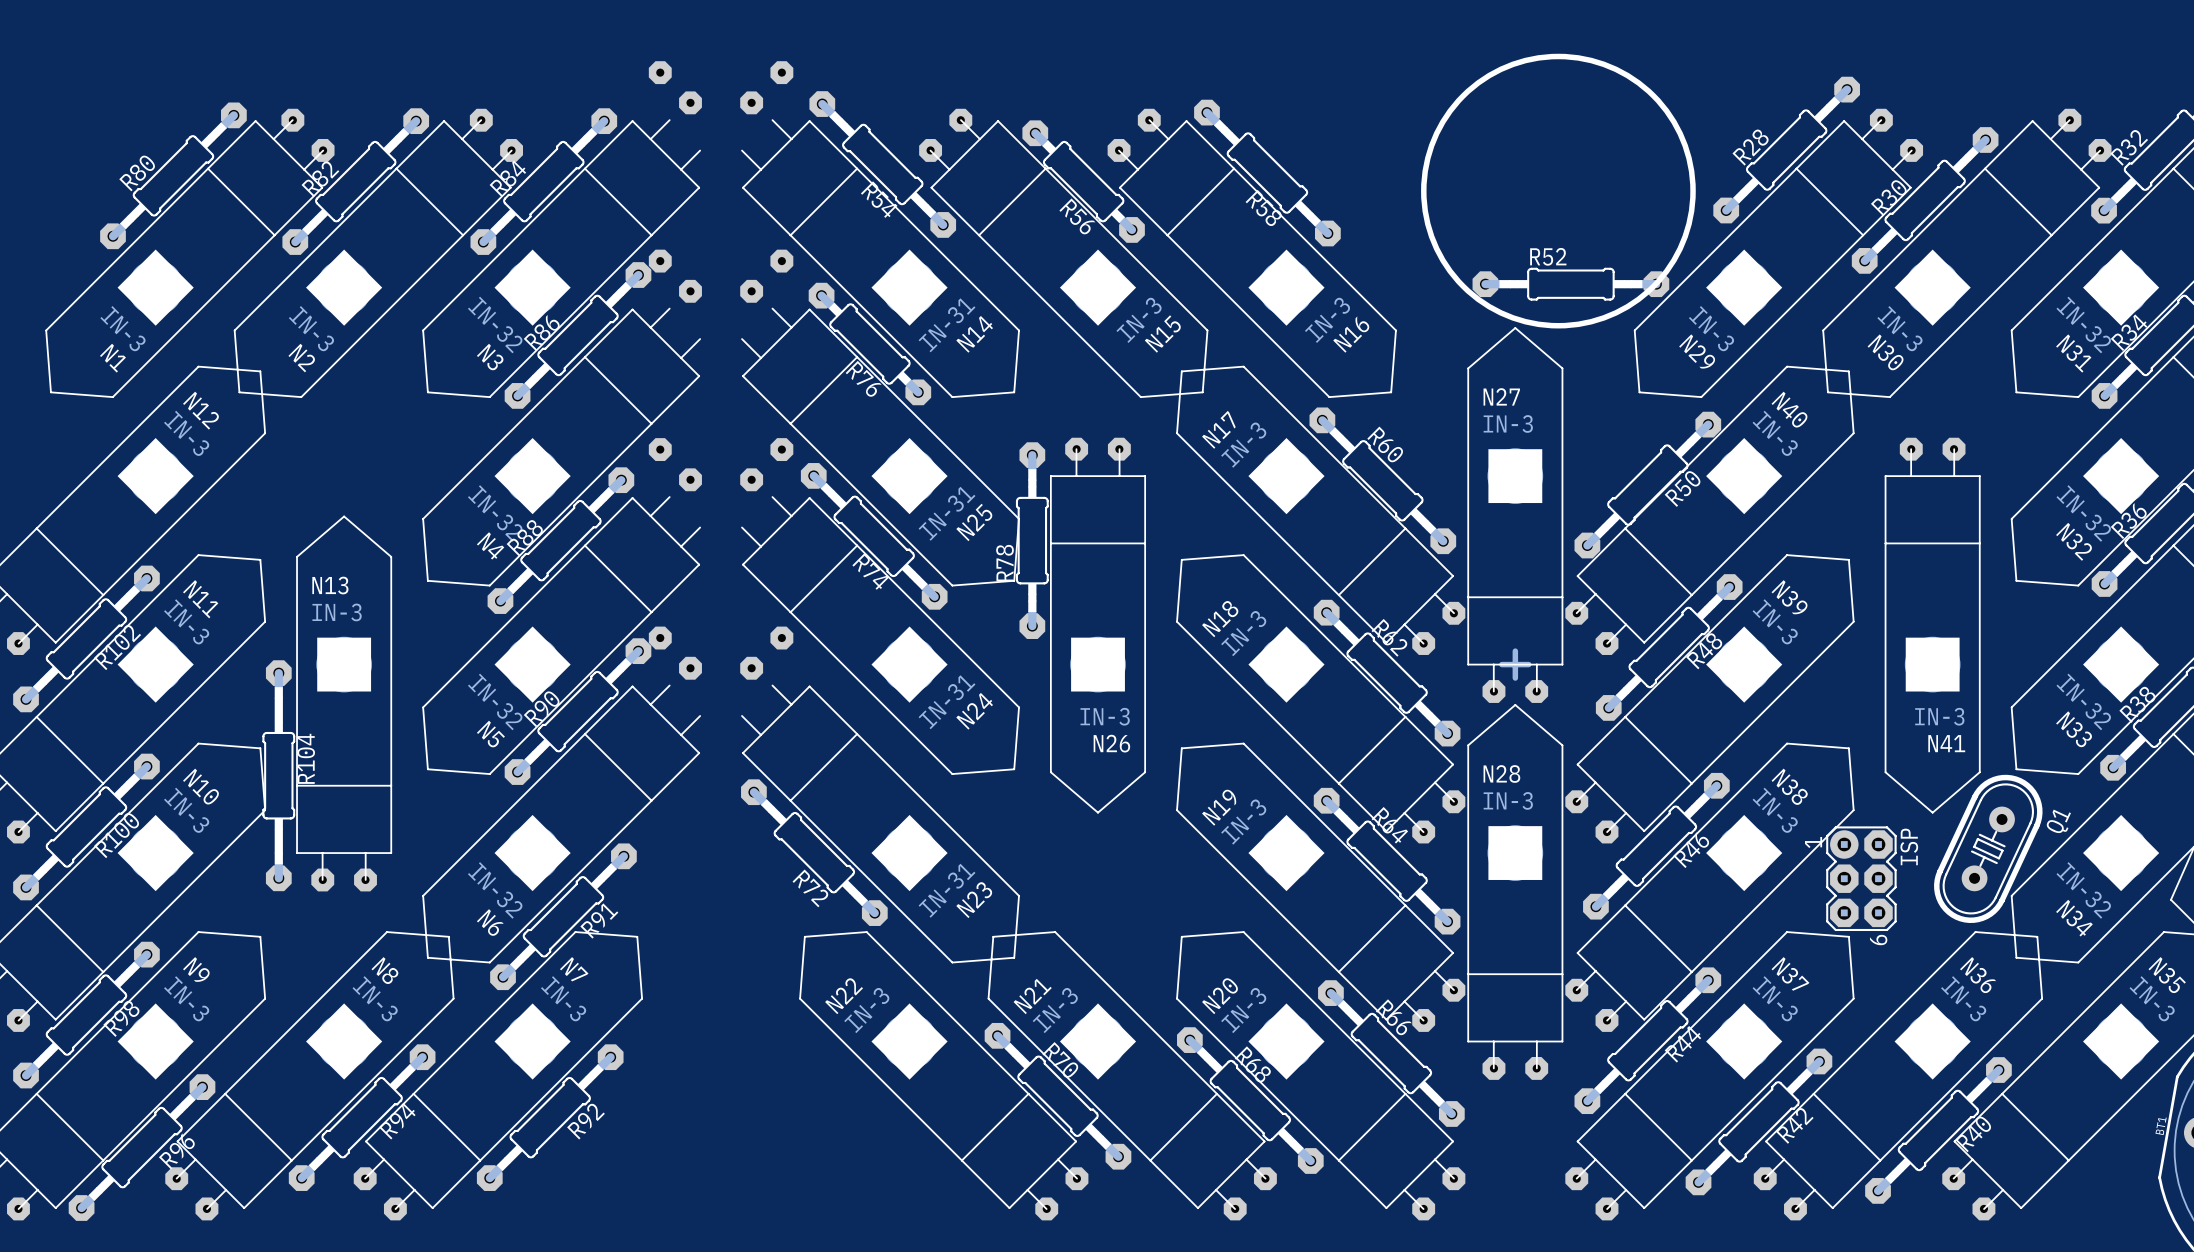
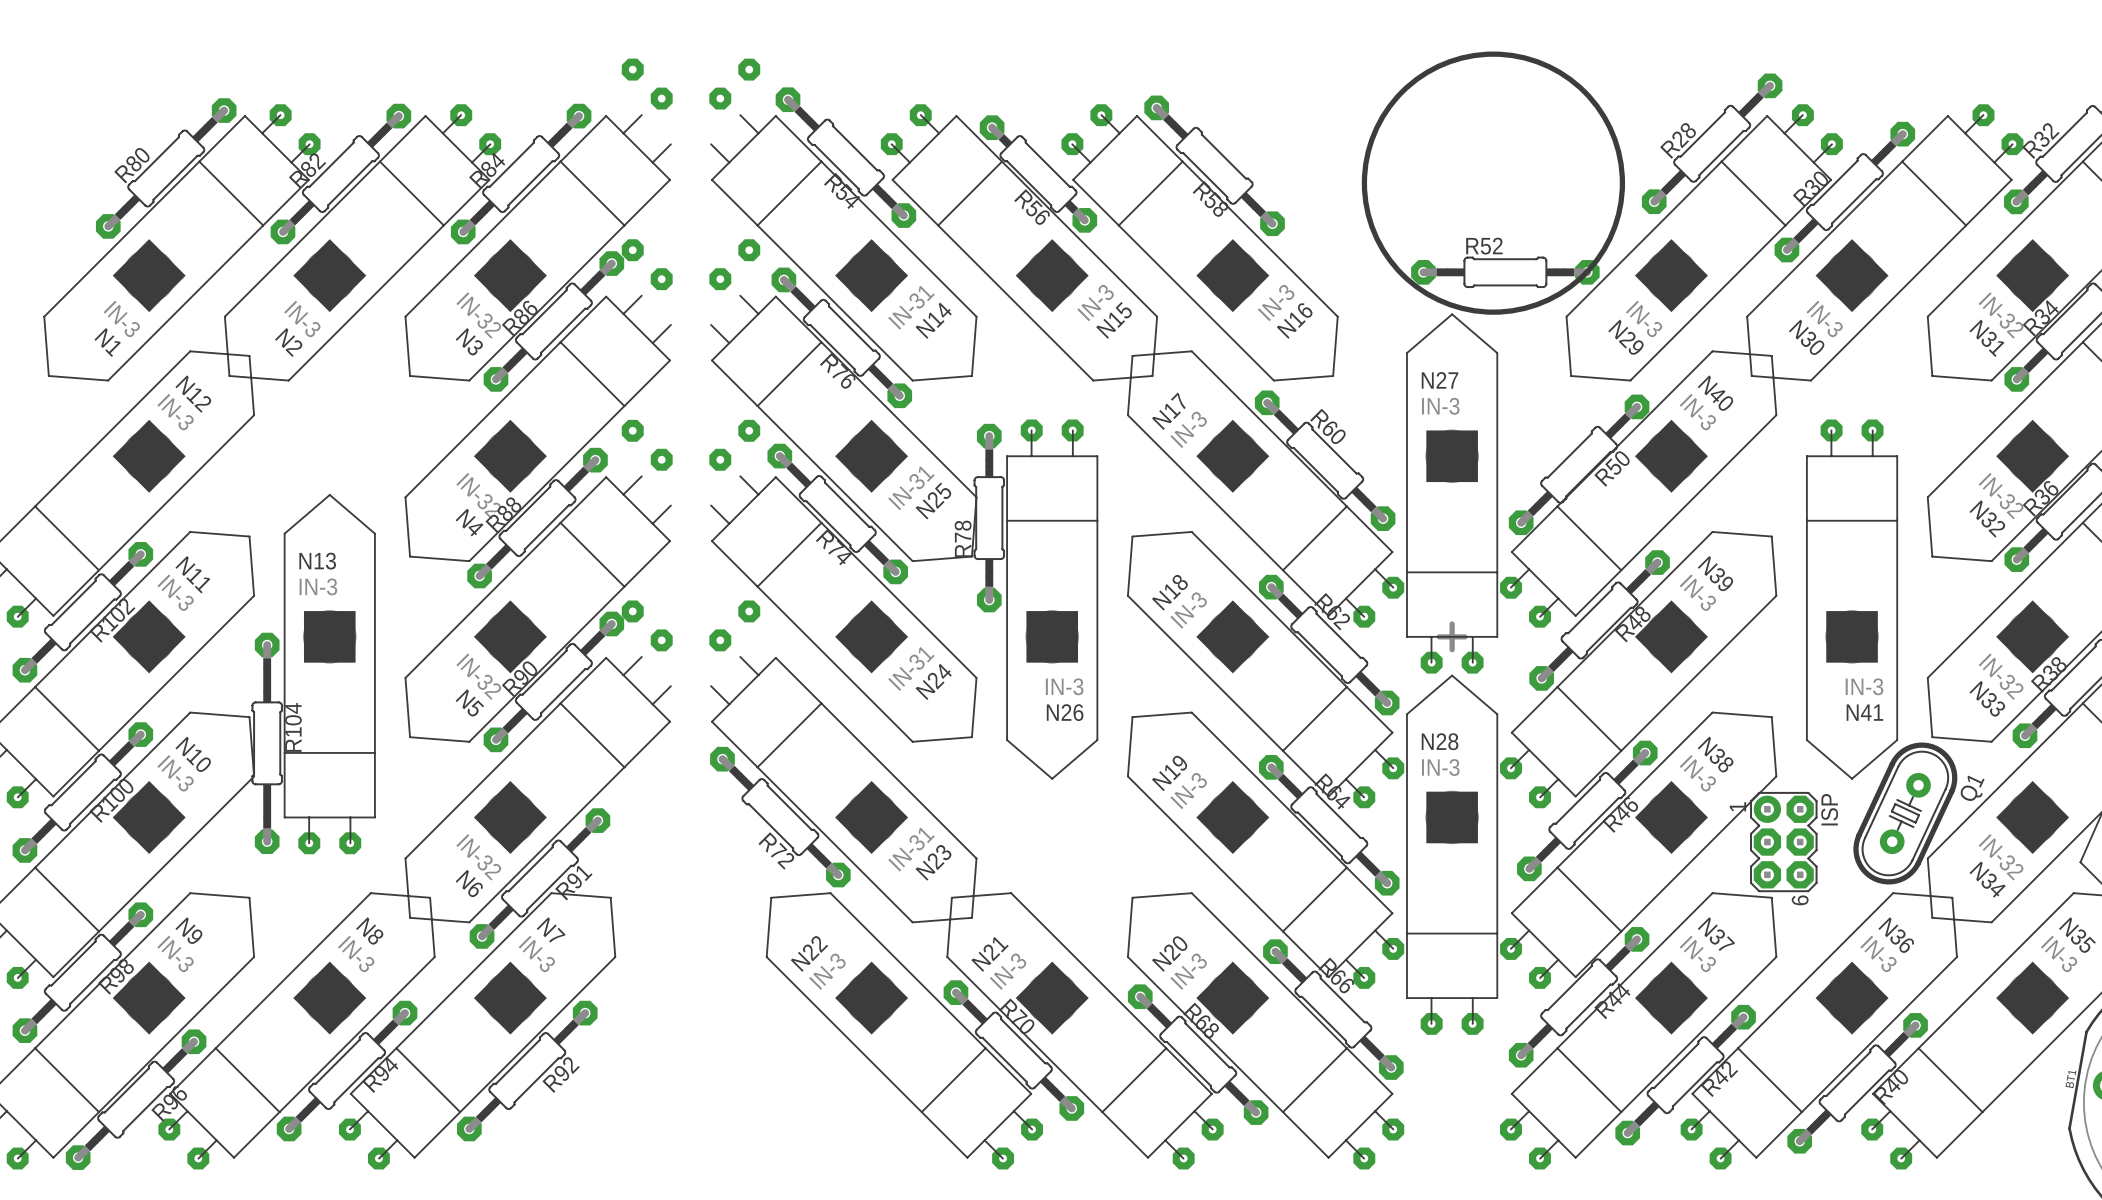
R76 footprint: [808, 282, 932, 406] -> [771, 267, 913, 409]

